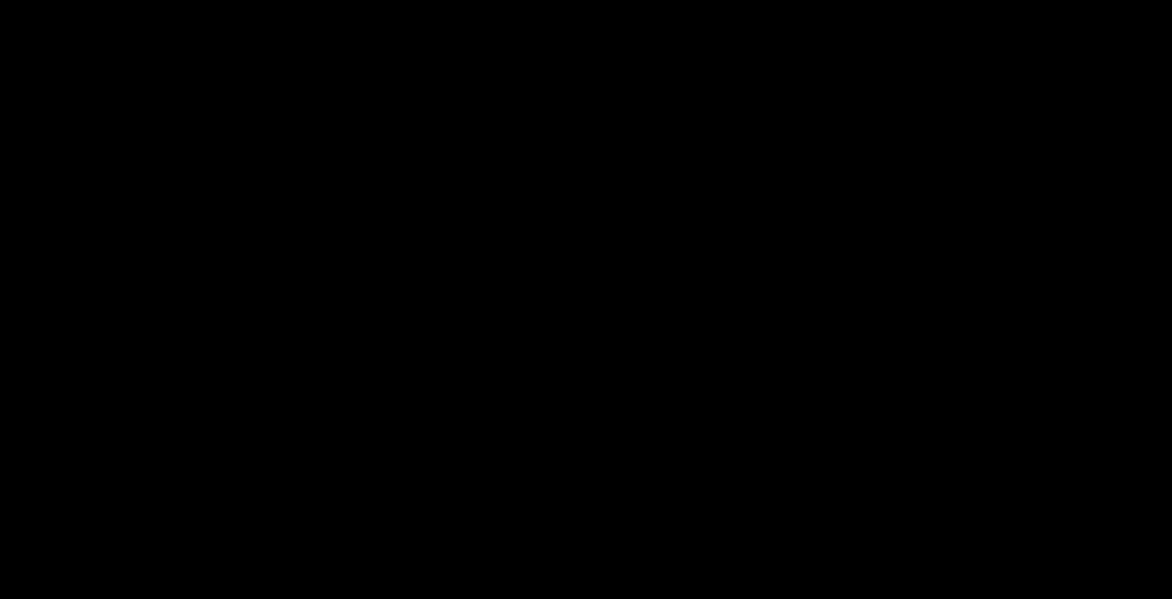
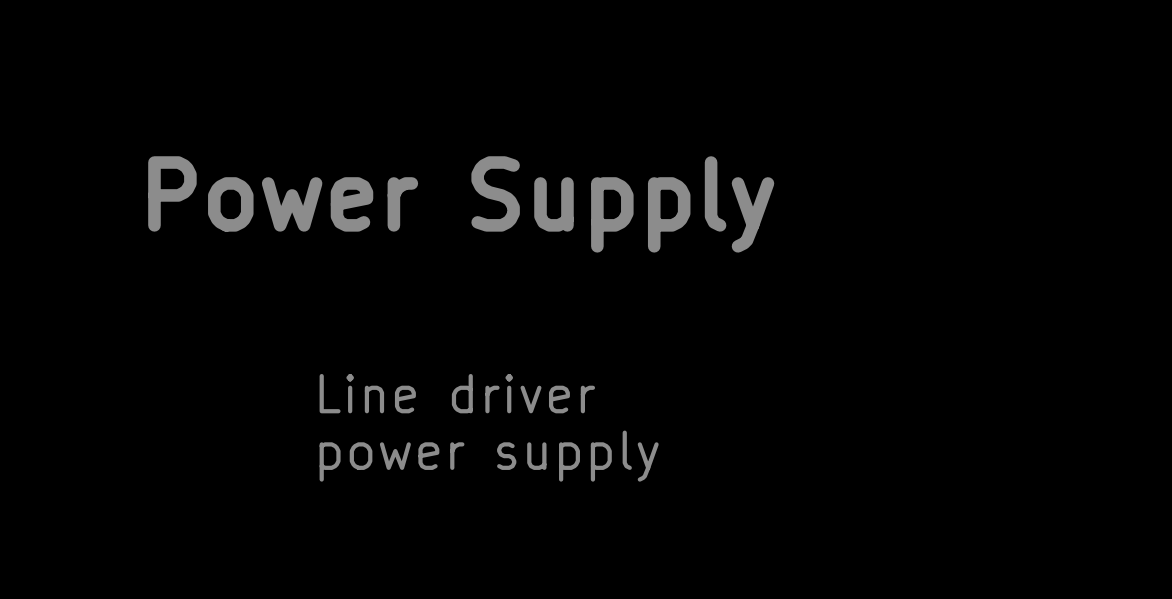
text: none -> Power Supply (461, 204)
text: none -> Line driver (457, 393)
text: none -> power supply (489, 456)

